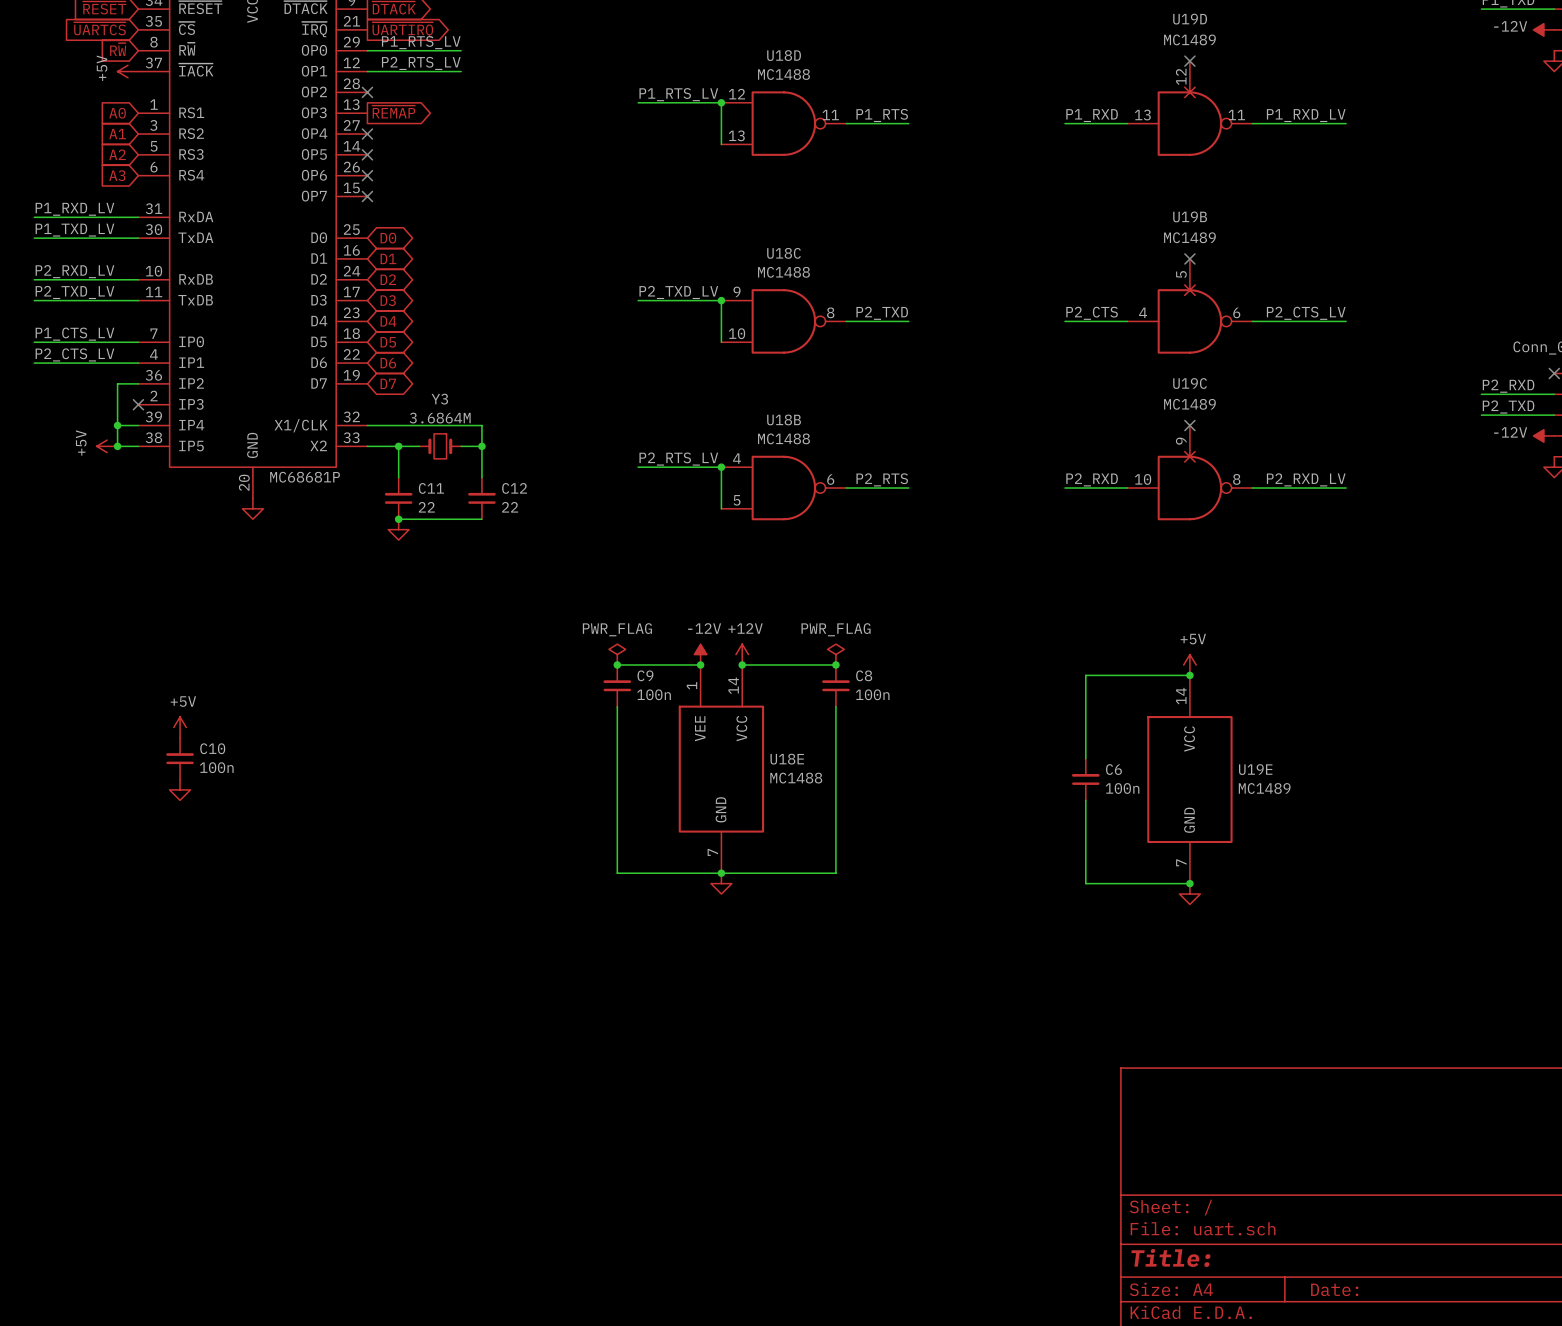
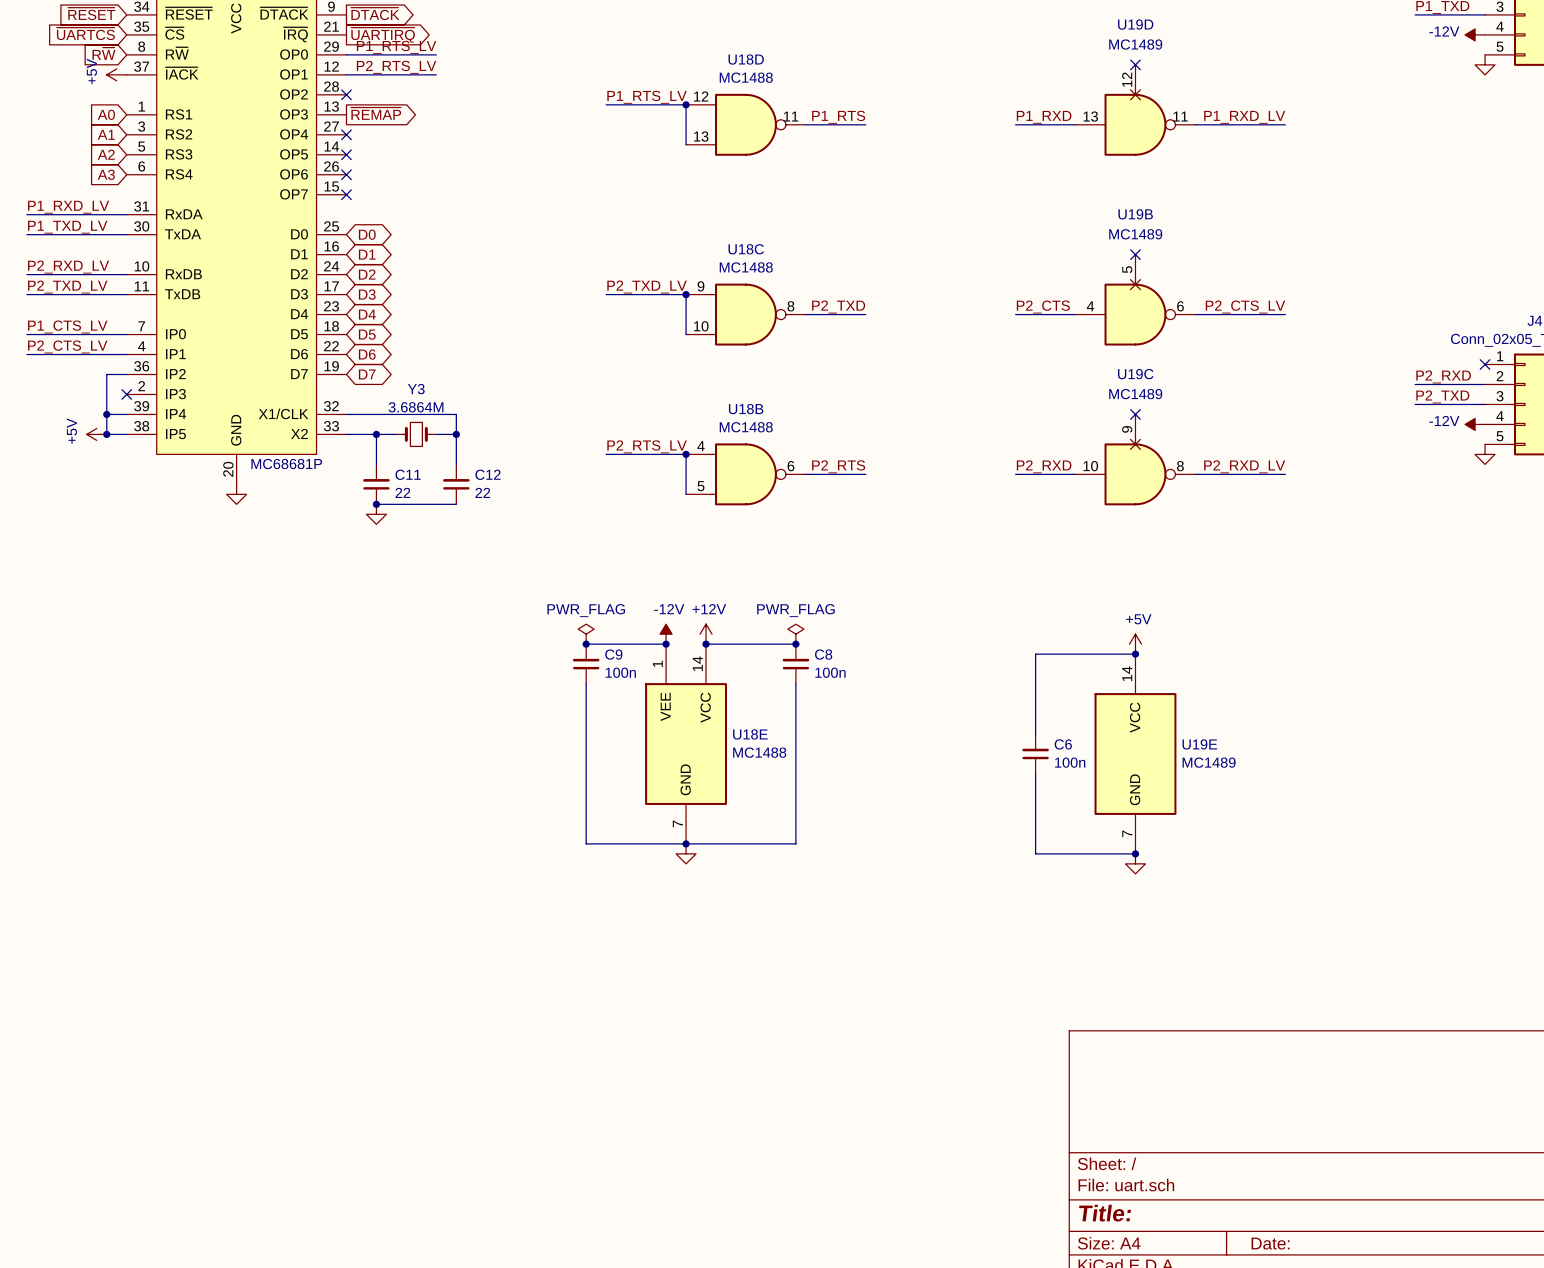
power symbol: +5V (180, 727) -> none
C10: 100n (180, 758) -> none
power symbol: (180, 789) -> none

